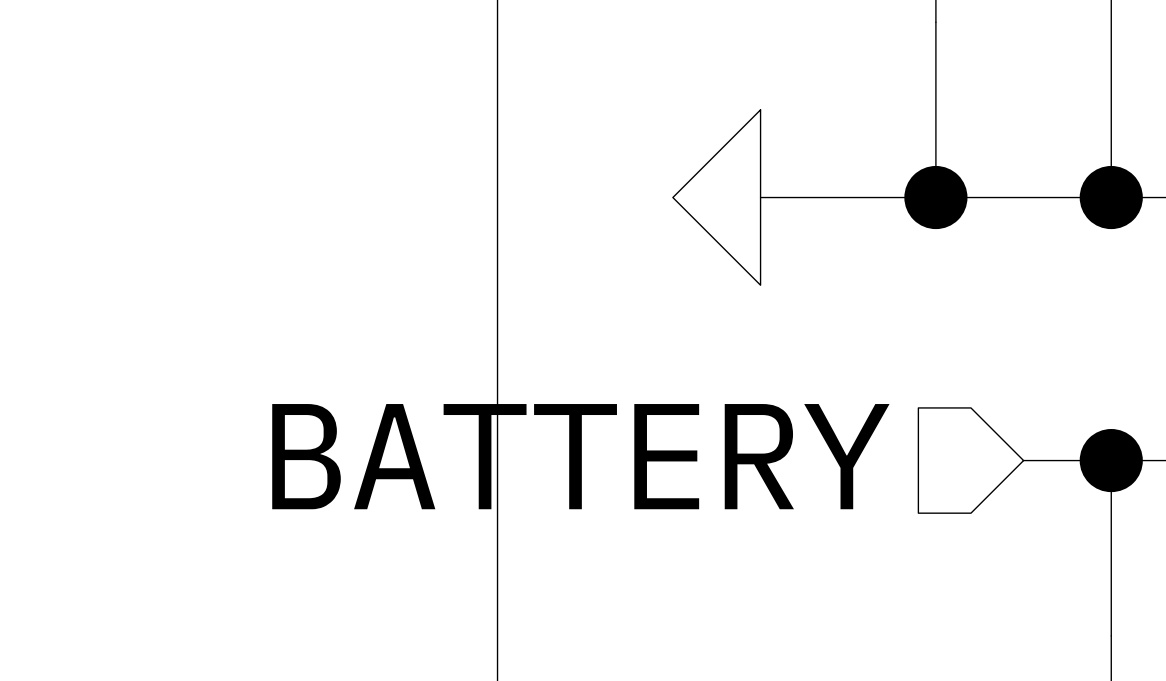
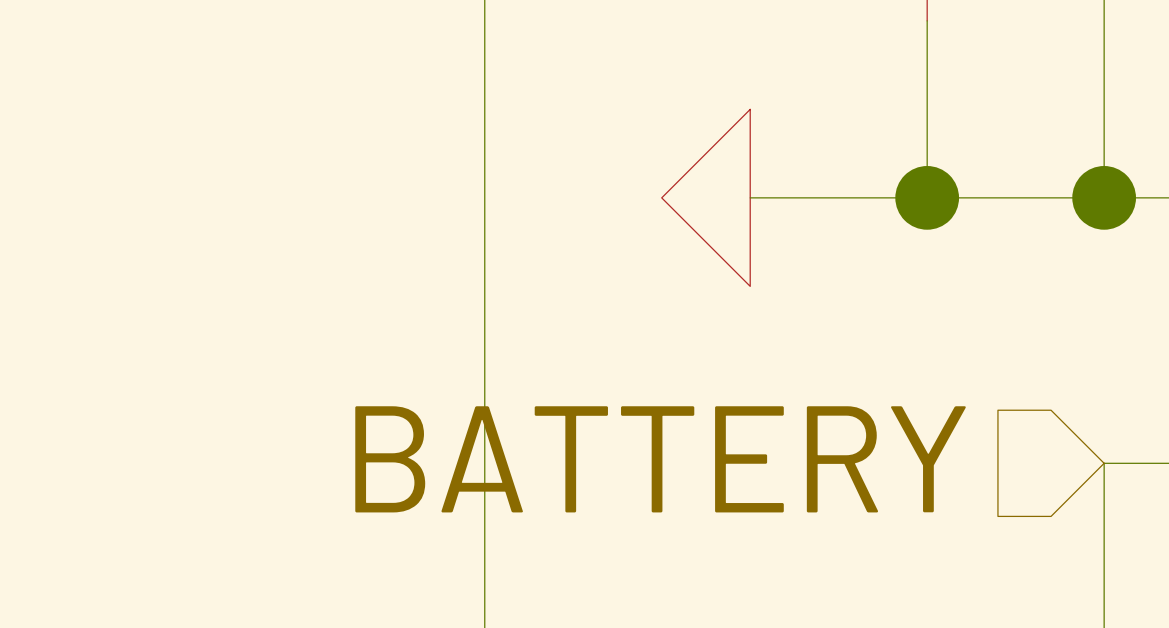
hierarchical label position: BATTERY (580, 456) -> BATTERY (660, 459)
wire: (1023, 460) (1111, 460) -> none
junction: (1111, 460) -> none

